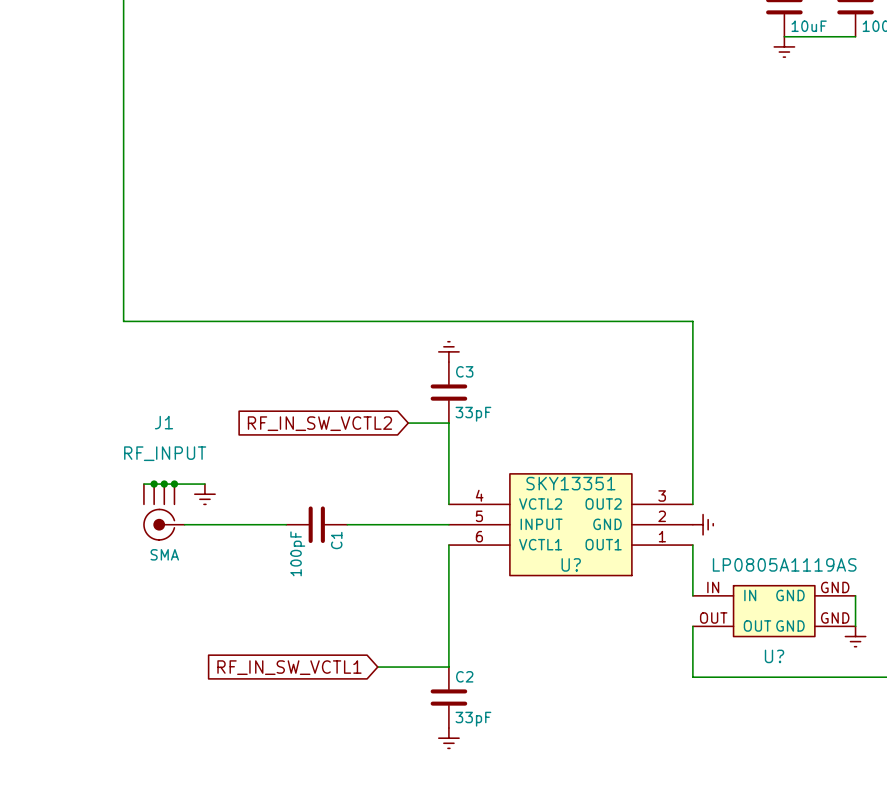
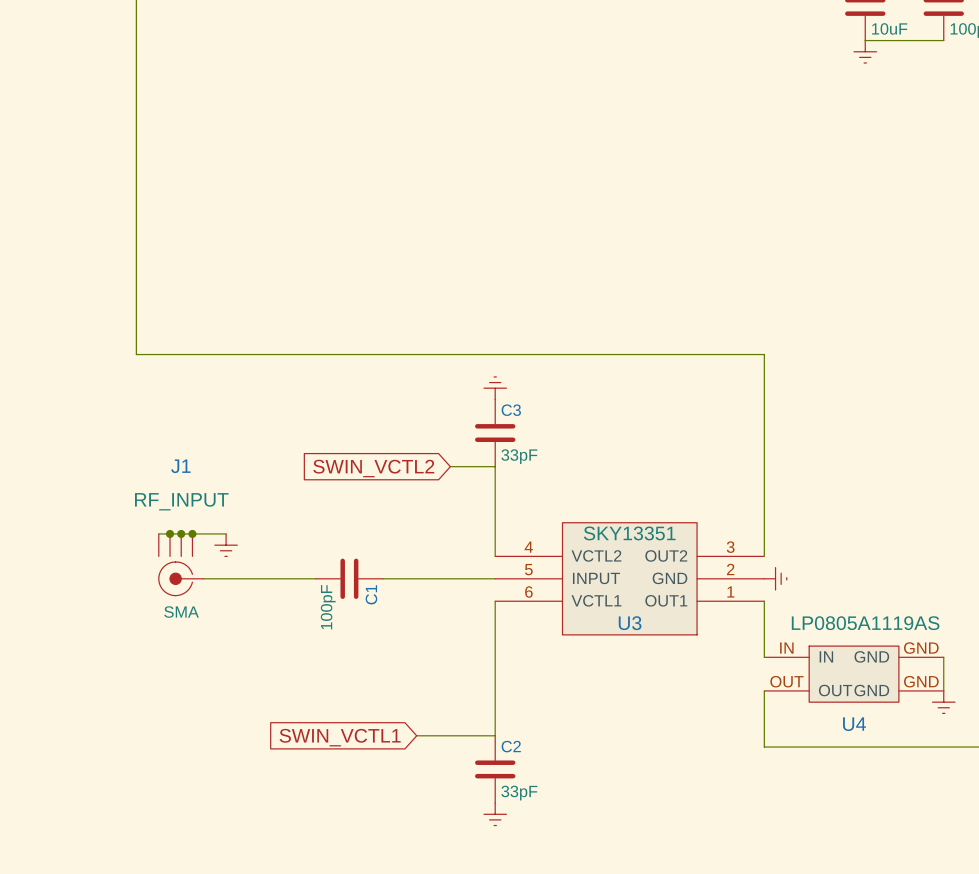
global label: RF_IN_SW_VCTL2 (319, 423) -> SWIN_VCTL2 (373, 468)
U? name: U? (571, 564) -> U3 (630, 623)
U? name: U? (774, 656) -> U4 (854, 724)
global label: RF_IN_SW_VCTL1 (289, 667) -> SWIN_VCTL1 (340, 737)

